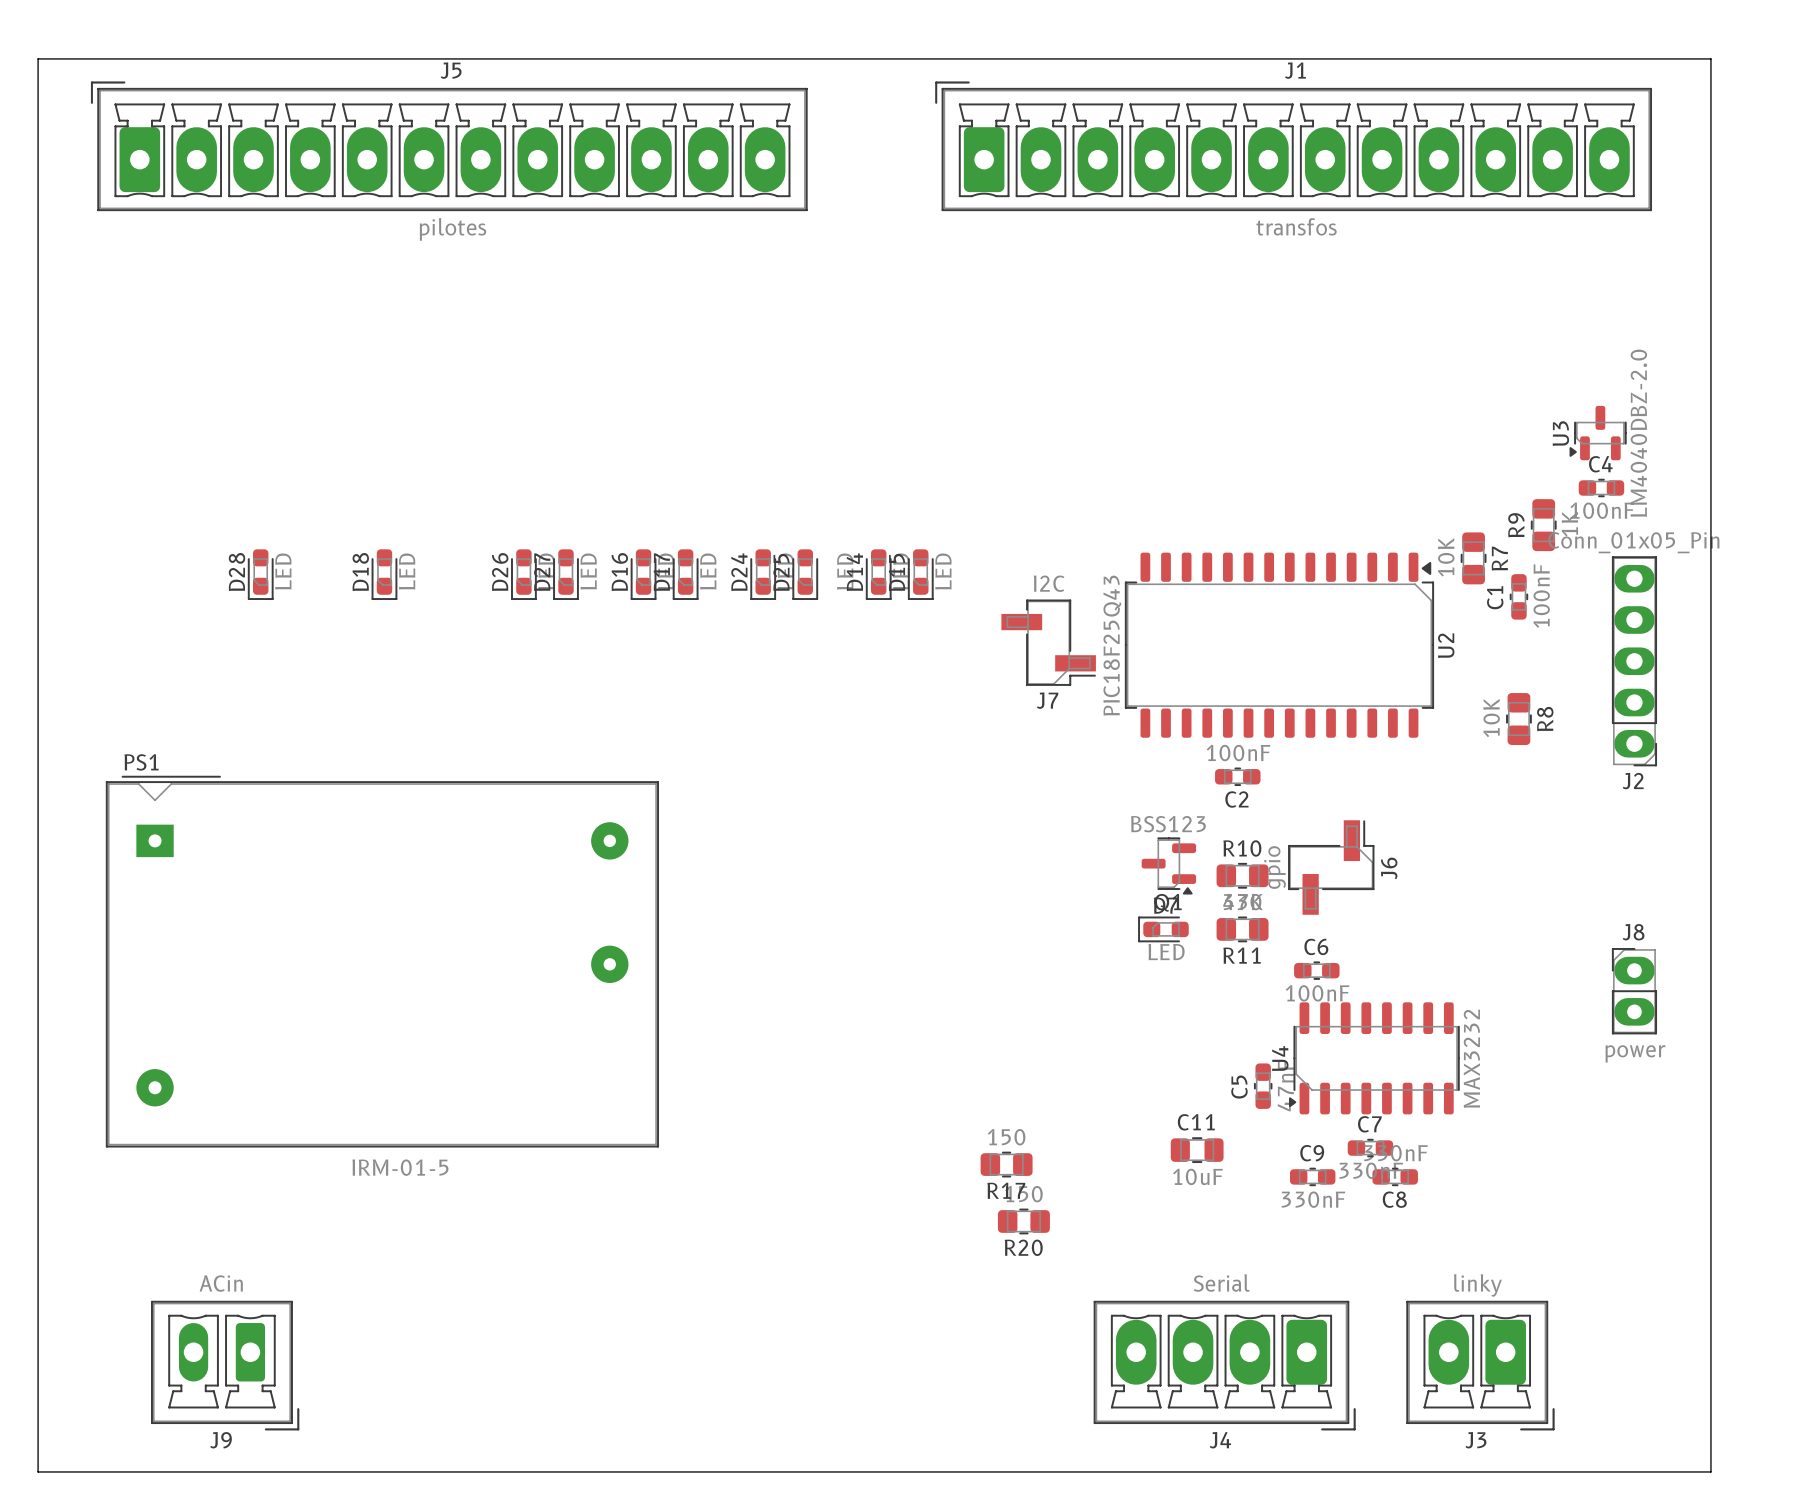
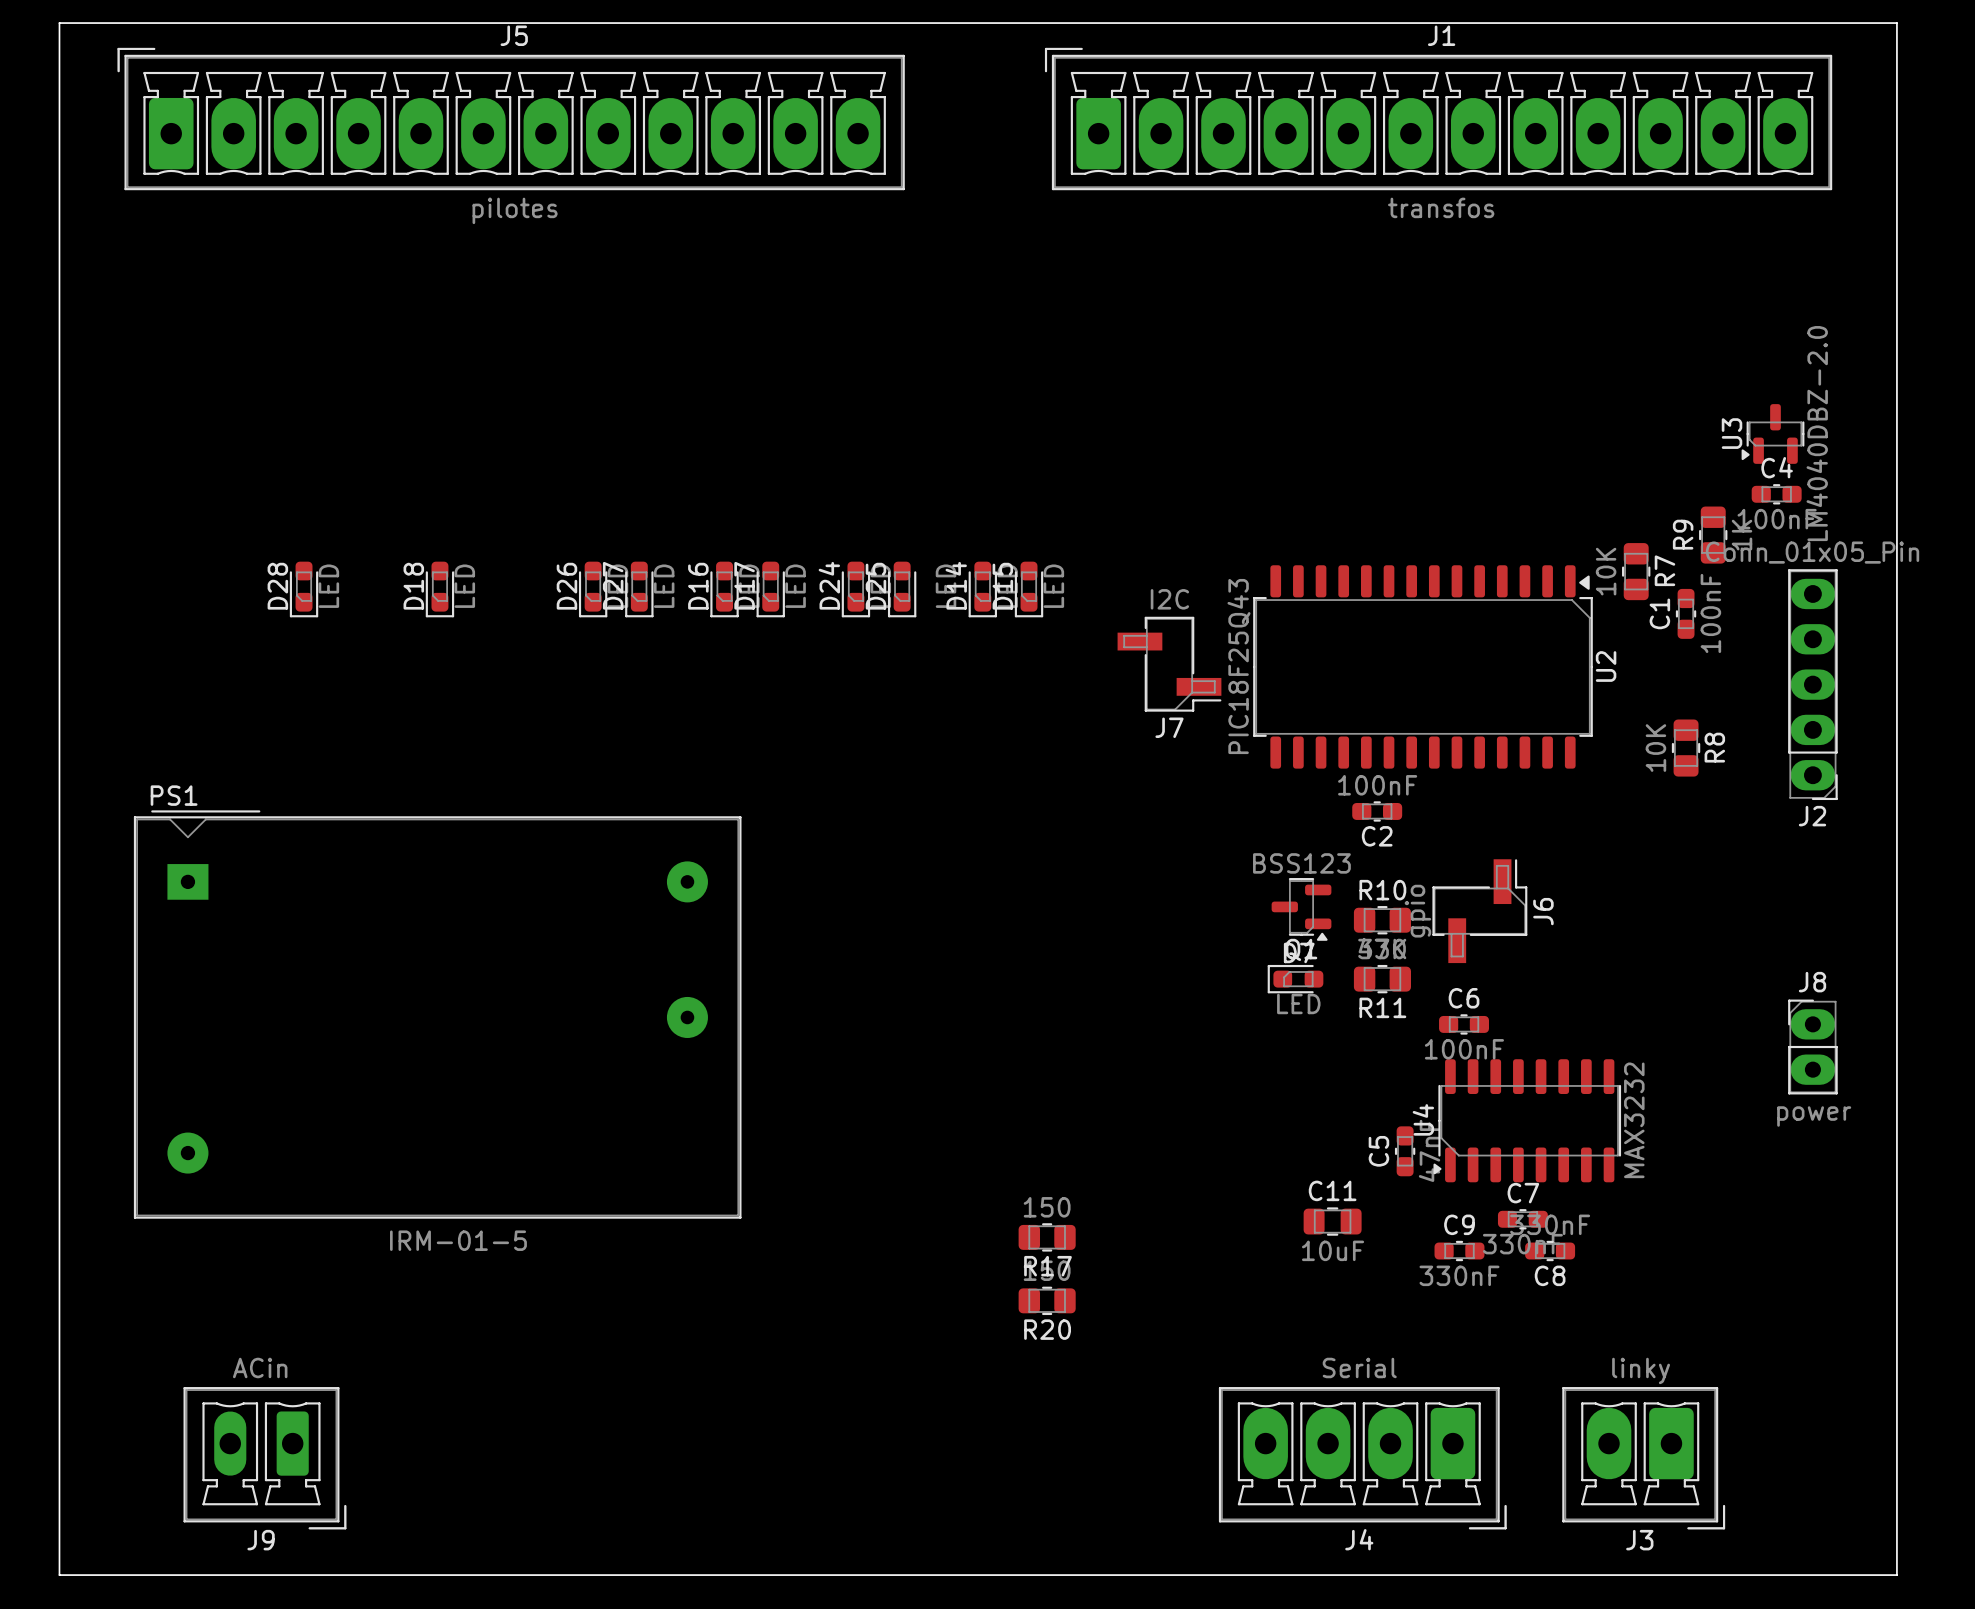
R17 position: (1006, 1164) -> (1047, 1237)
R20 position: (1023, 1221) -> (1047, 1300)

